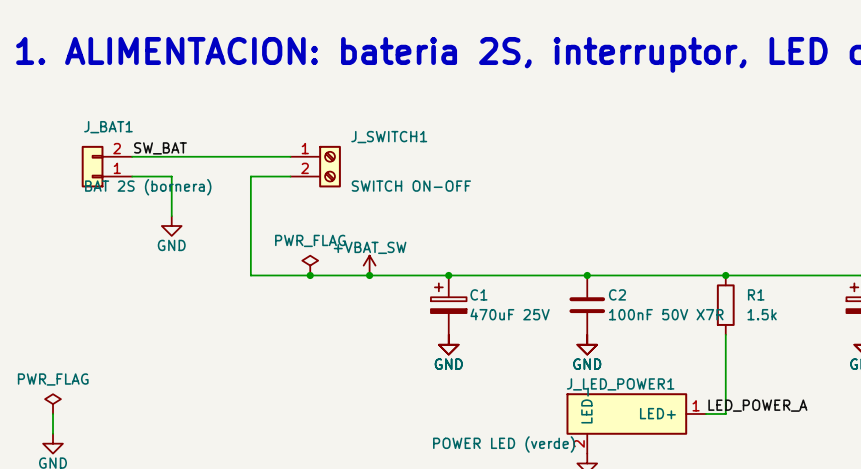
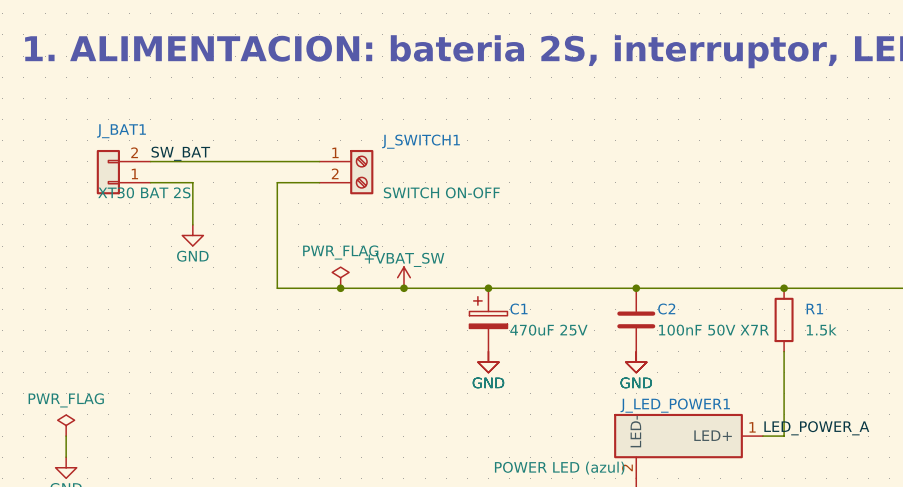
J_BAT1 value: BAT 2S (bornera) (148, 187) -> XT30 BAT 2S (144, 192)
J_LED_POWER1 value: POWER LED (verde) (504, 444) -> POWER LED (azul) (559, 468)

